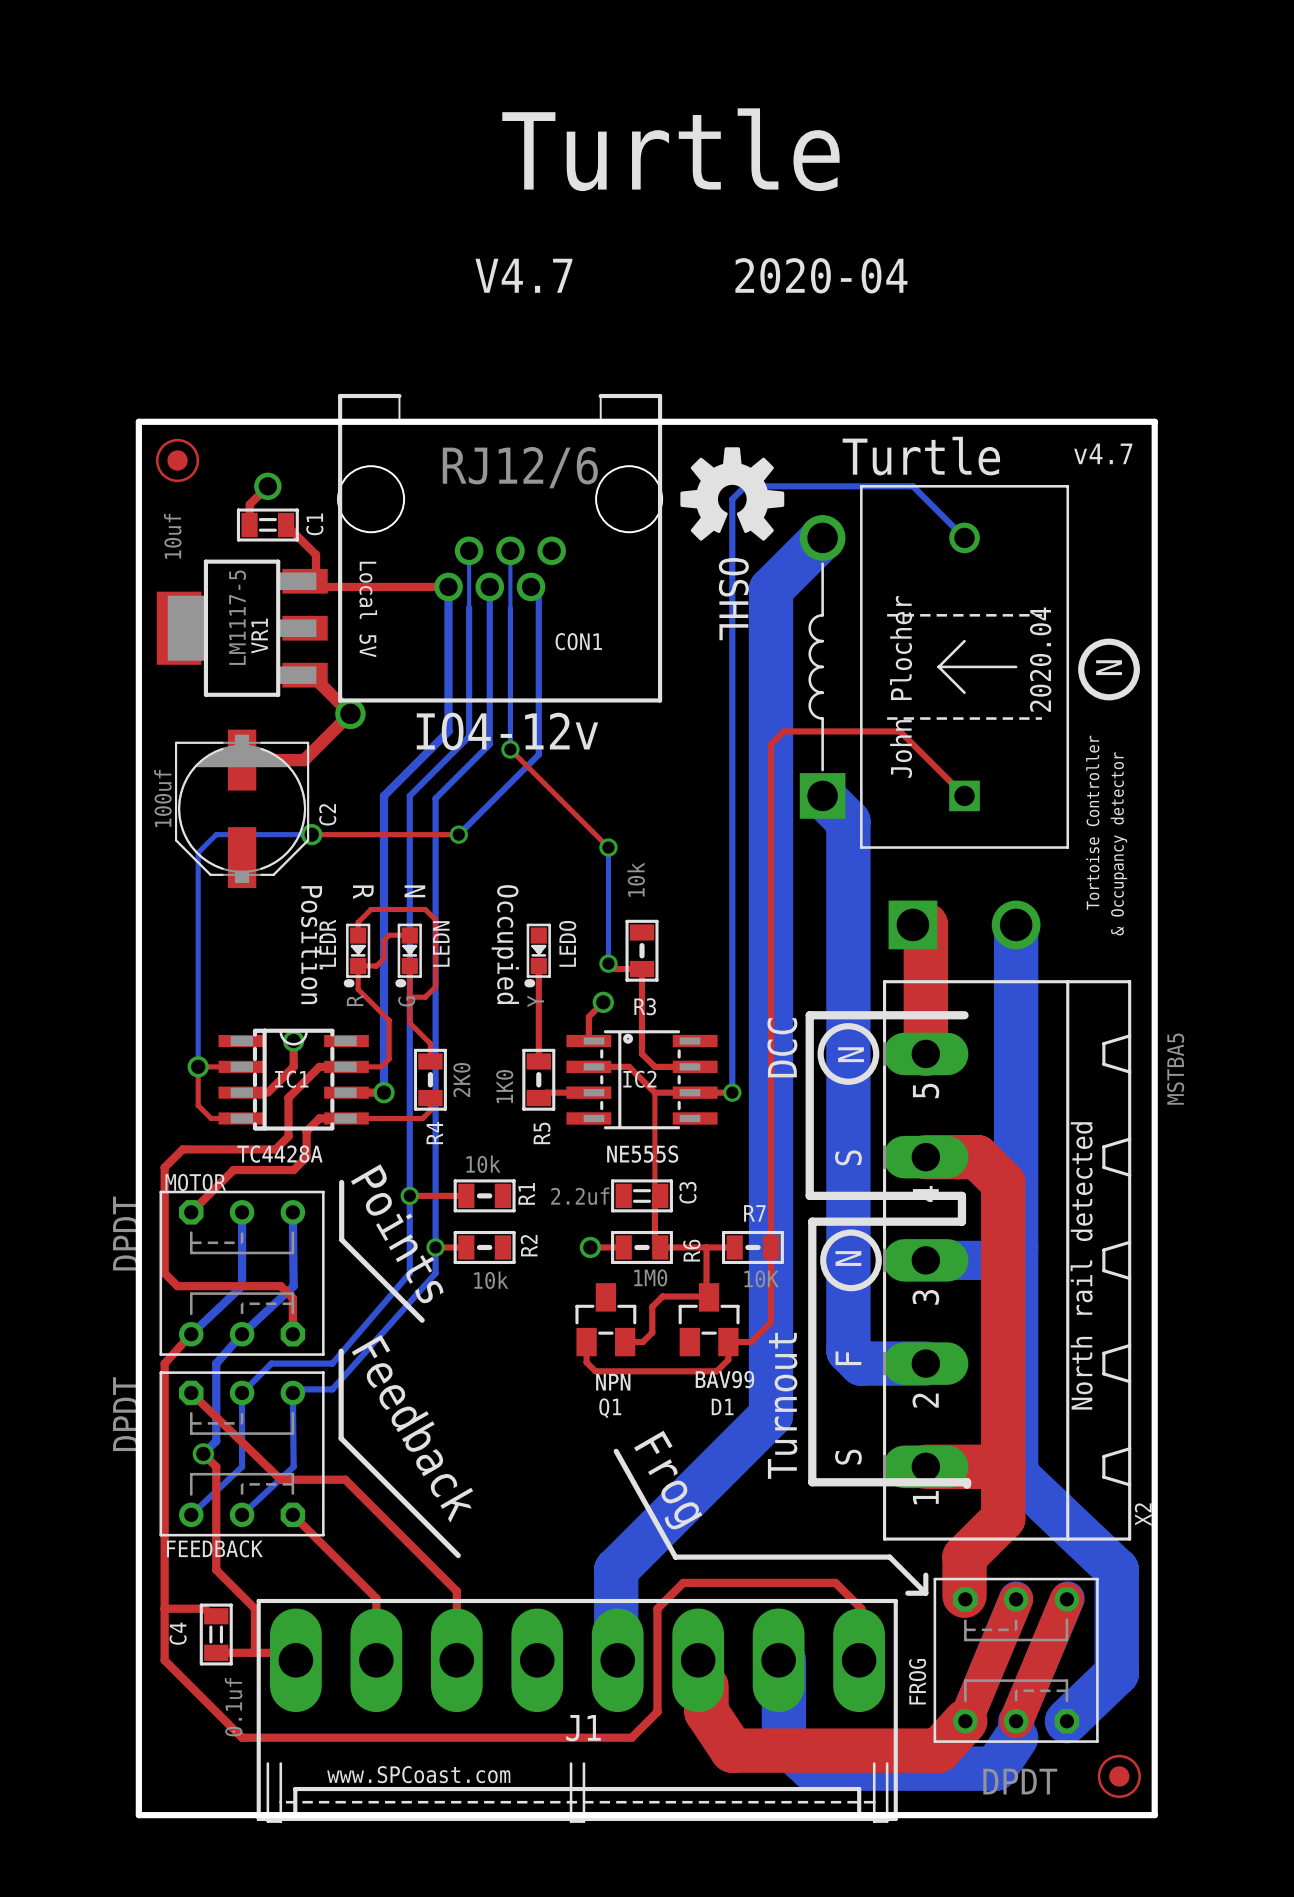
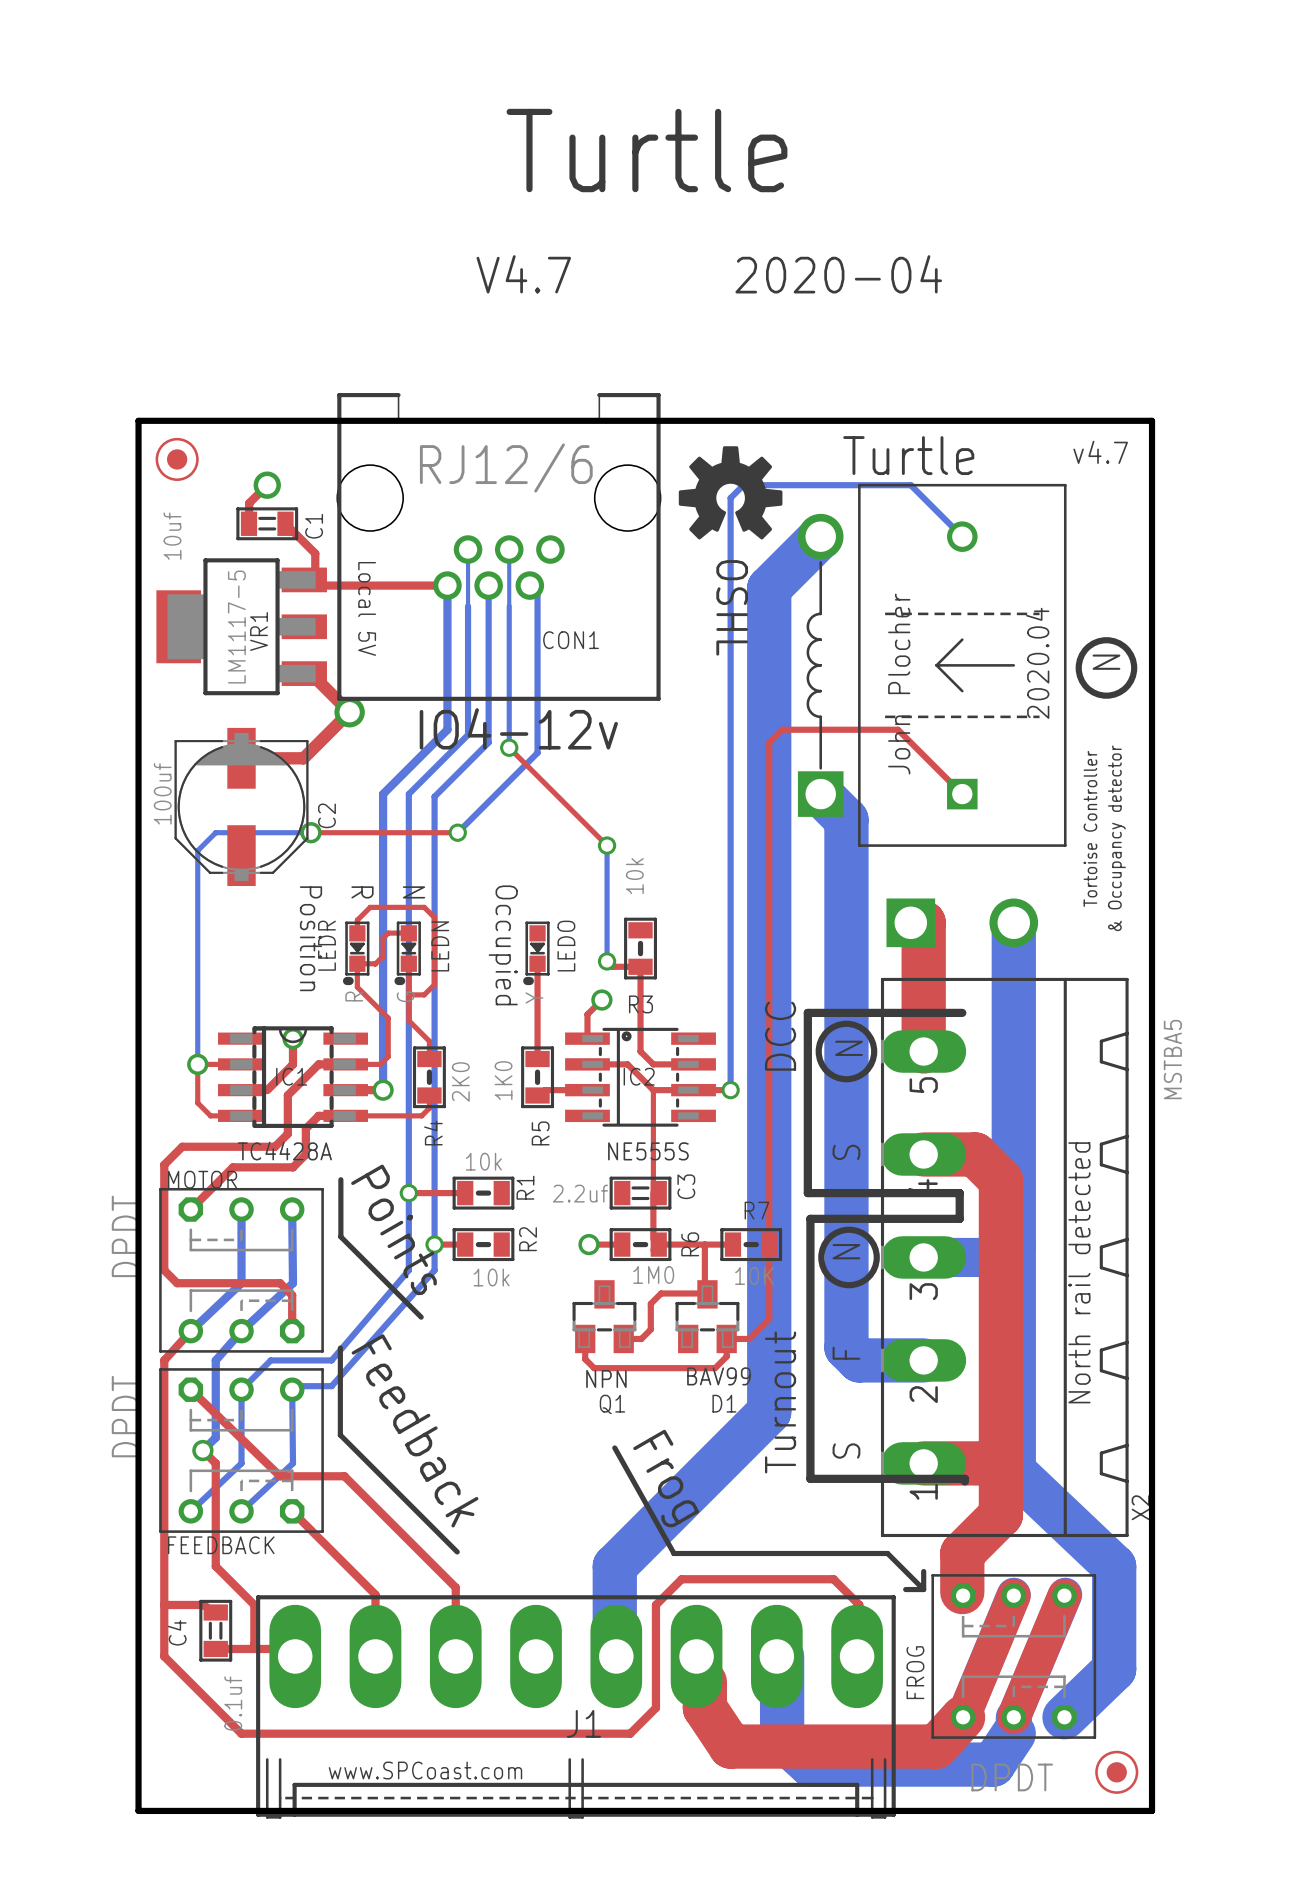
Q1 footprint: [575, 1283, 637, 1357] -> [572, 1280, 637, 1354]
D1 footprint: [678, 1283, 740, 1357] -> [675, 1280, 740, 1354]

